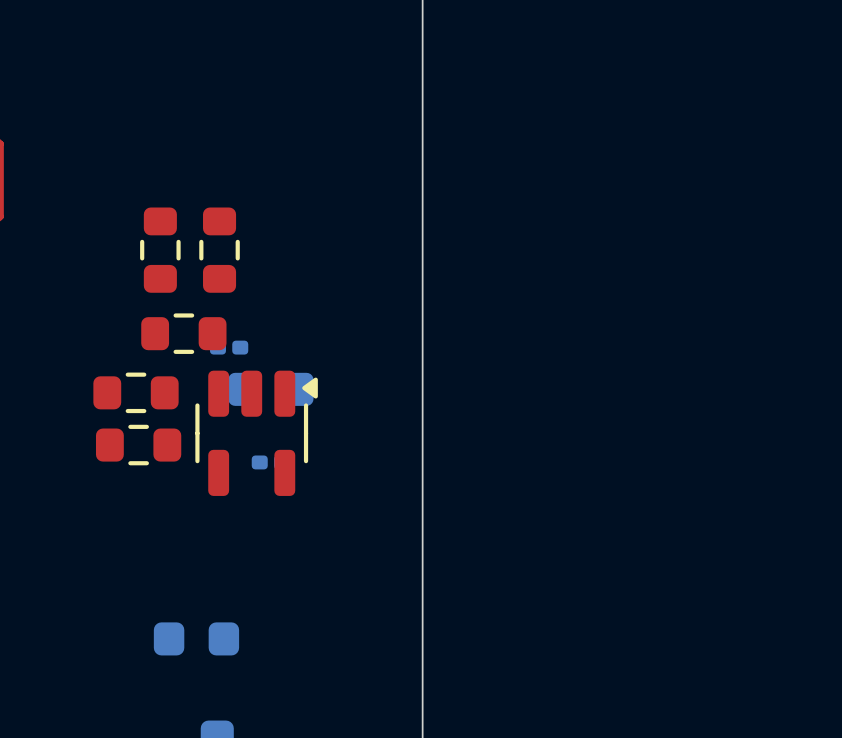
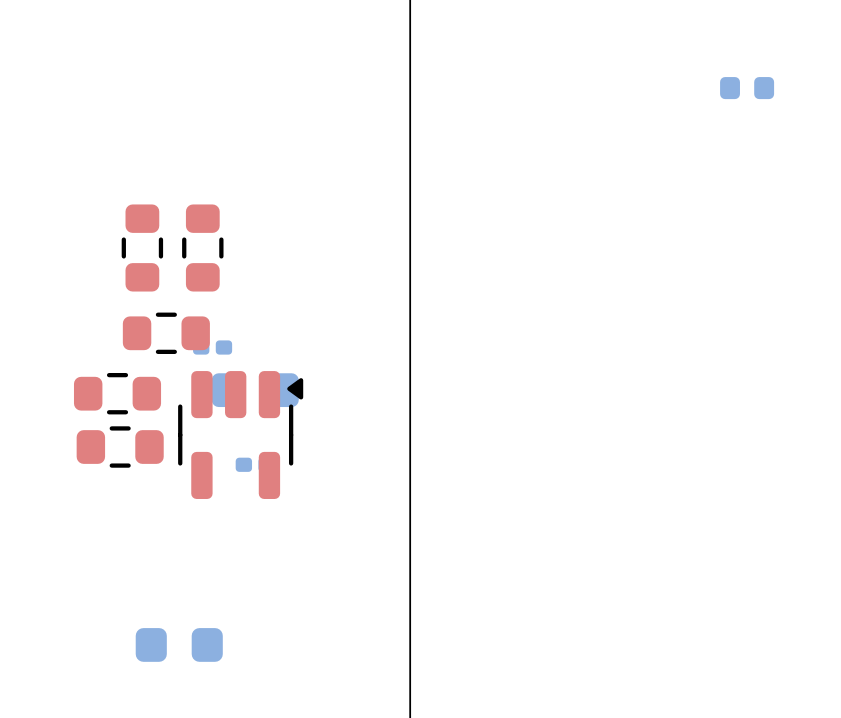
part: none -> (747, 88)

